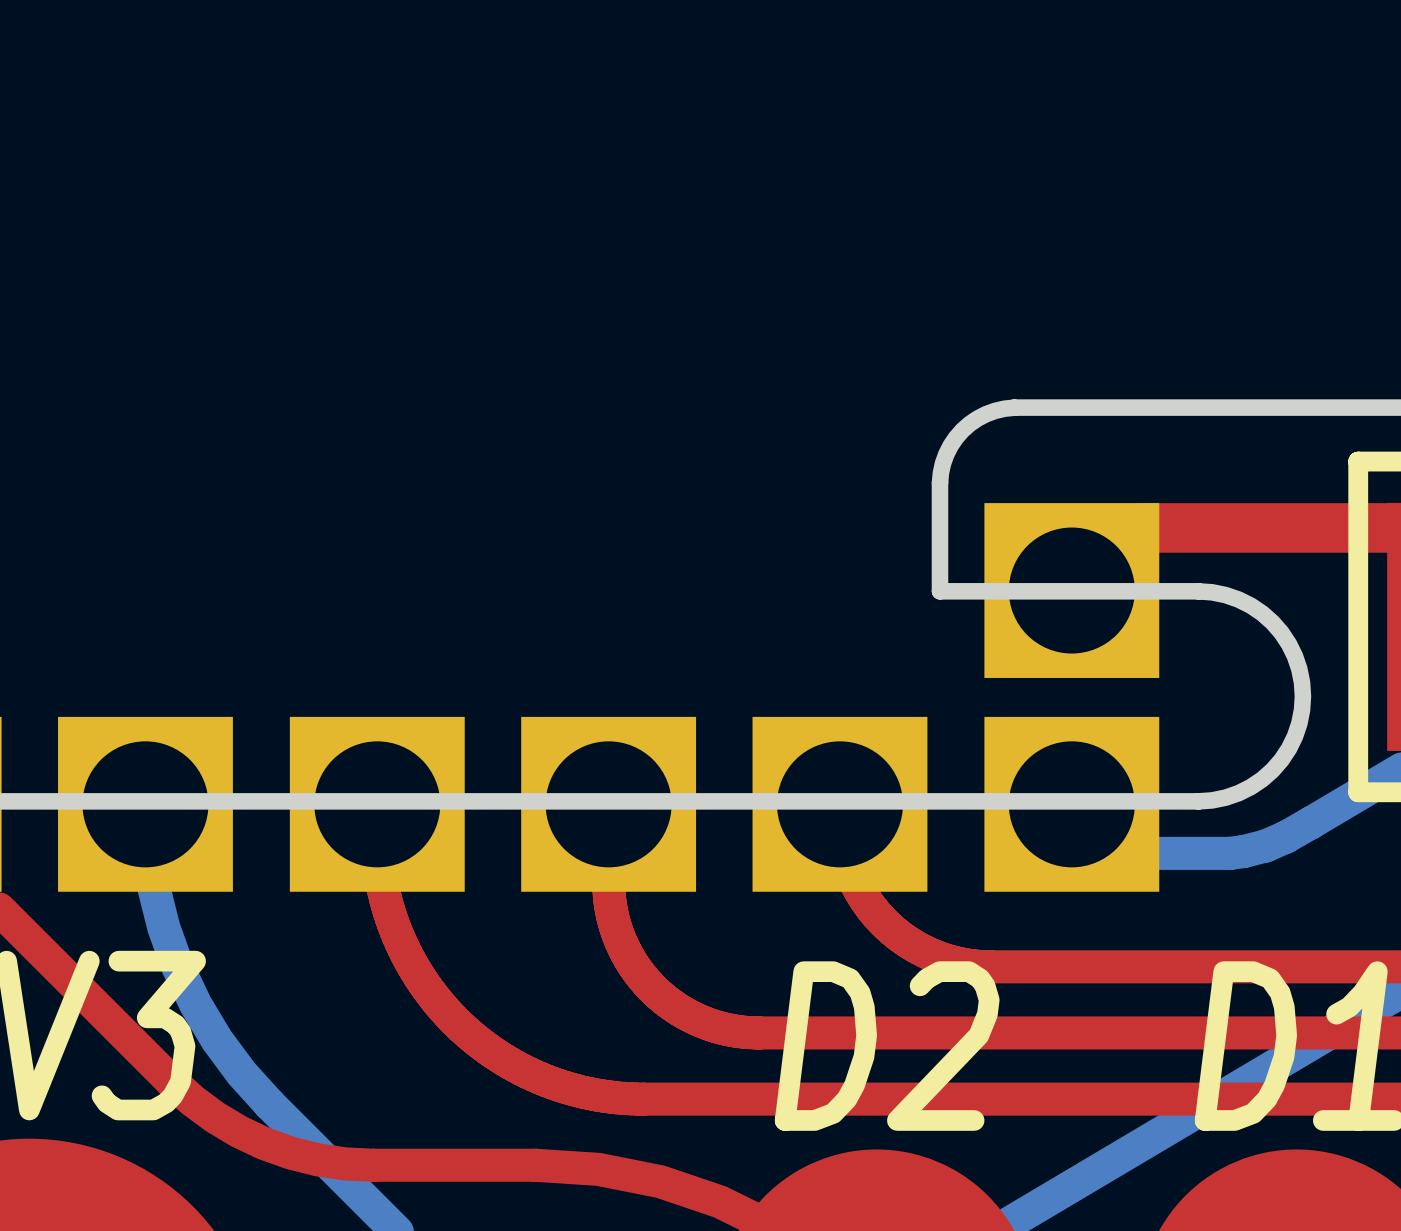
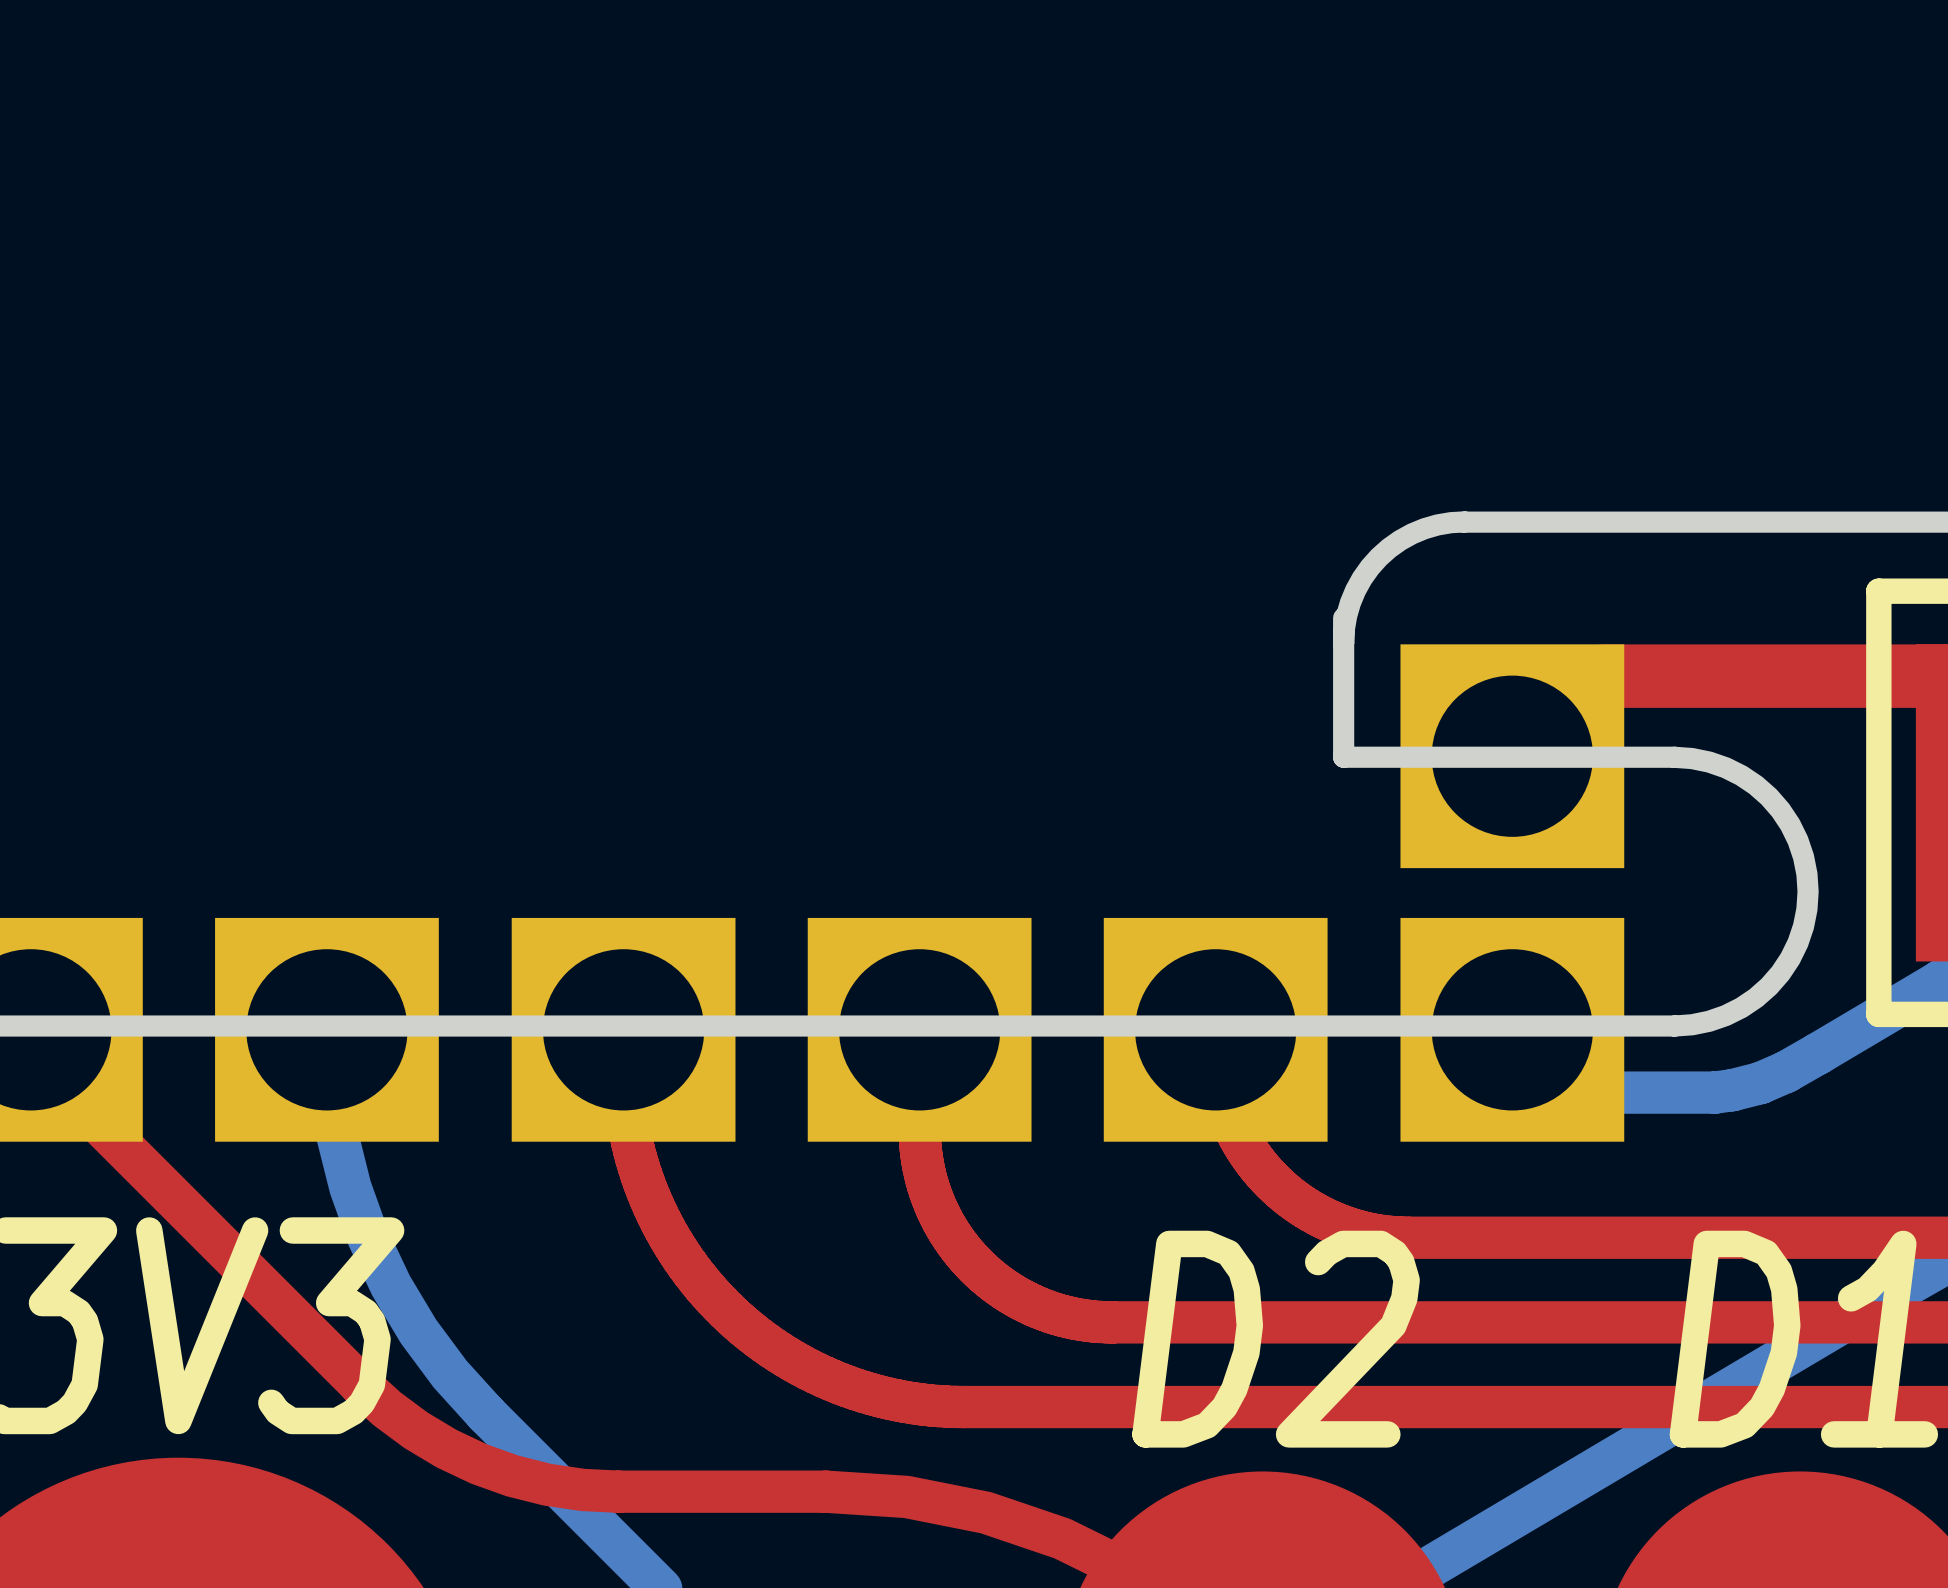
board edge: (1034, 407) (1014, 407) (995, 410) (969, 424) (956, 437) (946, 454) (940, 482) -> (1464, 521) (1450, 522) (1424, 528) (1400, 540) (1379, 557) (1362, 578) (1350, 602) (1346, 615) (1343, 642)

